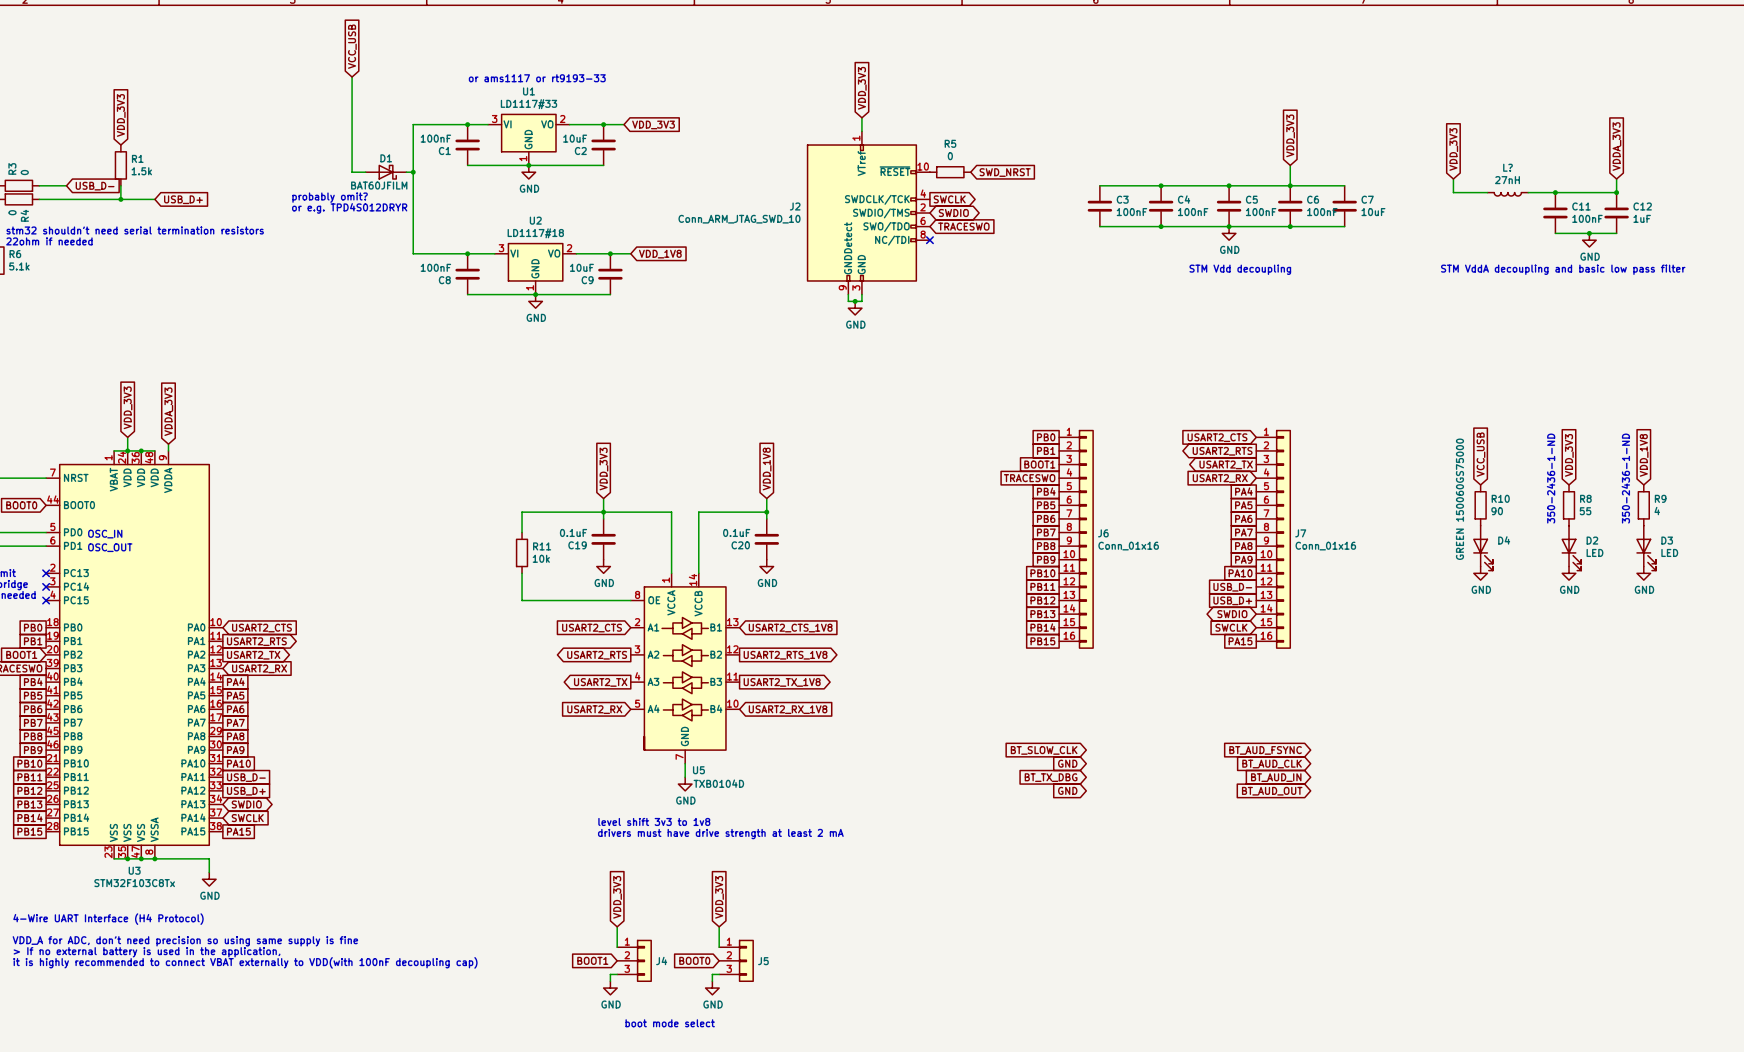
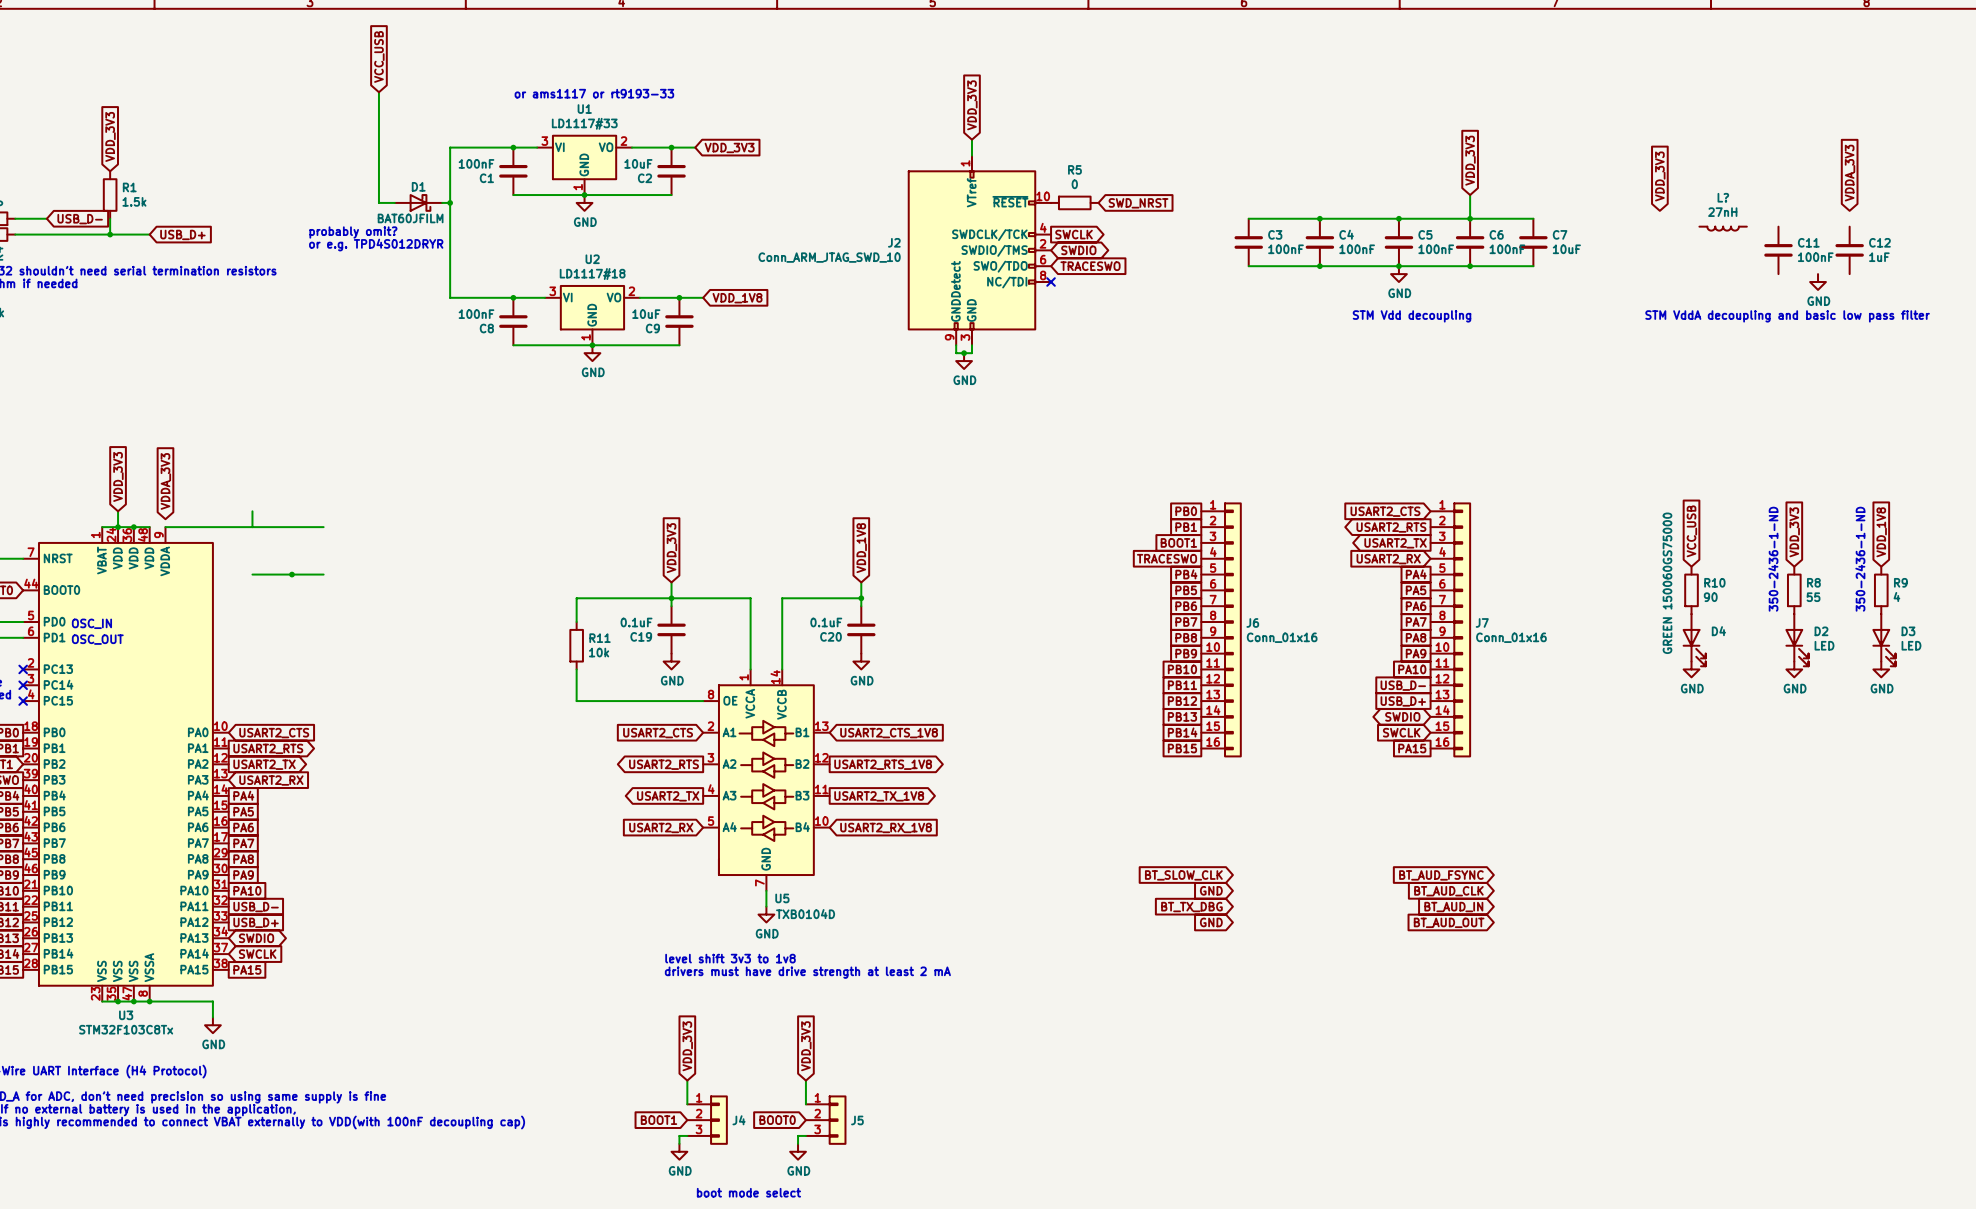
wire: (1453, 179) (1453, 192) (1487, 192) -> none
wire: (1616, 179) (1616, 192) (1528, 192) -> none
junction: (1555, 192) -> none
junction: (1616, 192) -> none
wire: (1555, 233) (1616, 233) -> none
junction: (1589, 233) -> none
wire: none -> (252, 511) (252, 527)
wire: (168, 444) (168, 450) -> (323, 527) (165, 527)
wire: none -> (252, 574) (323, 574)
junction: none -> (291, 574)

